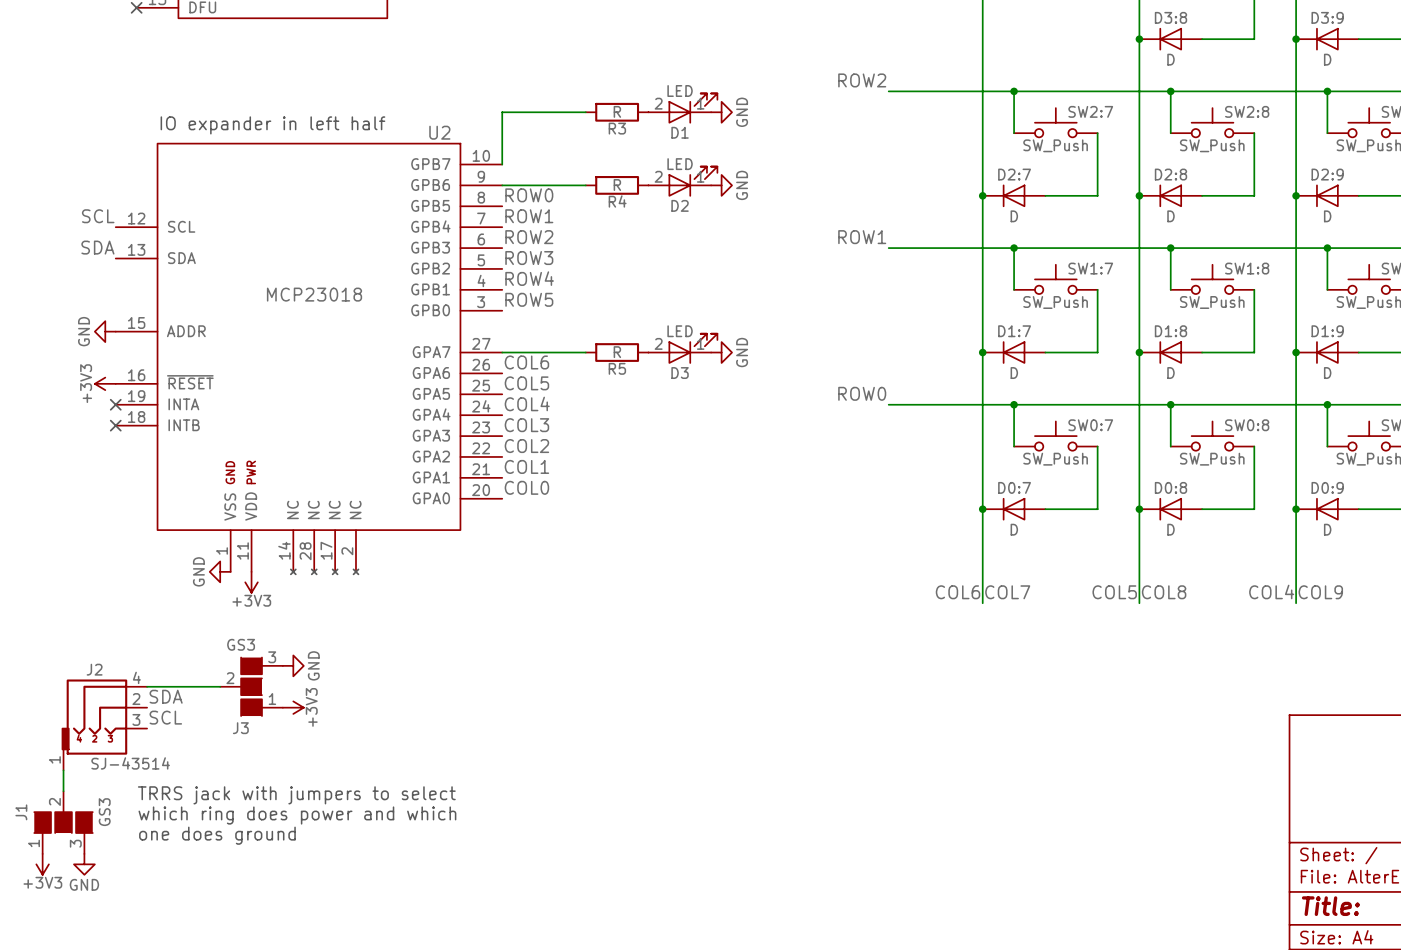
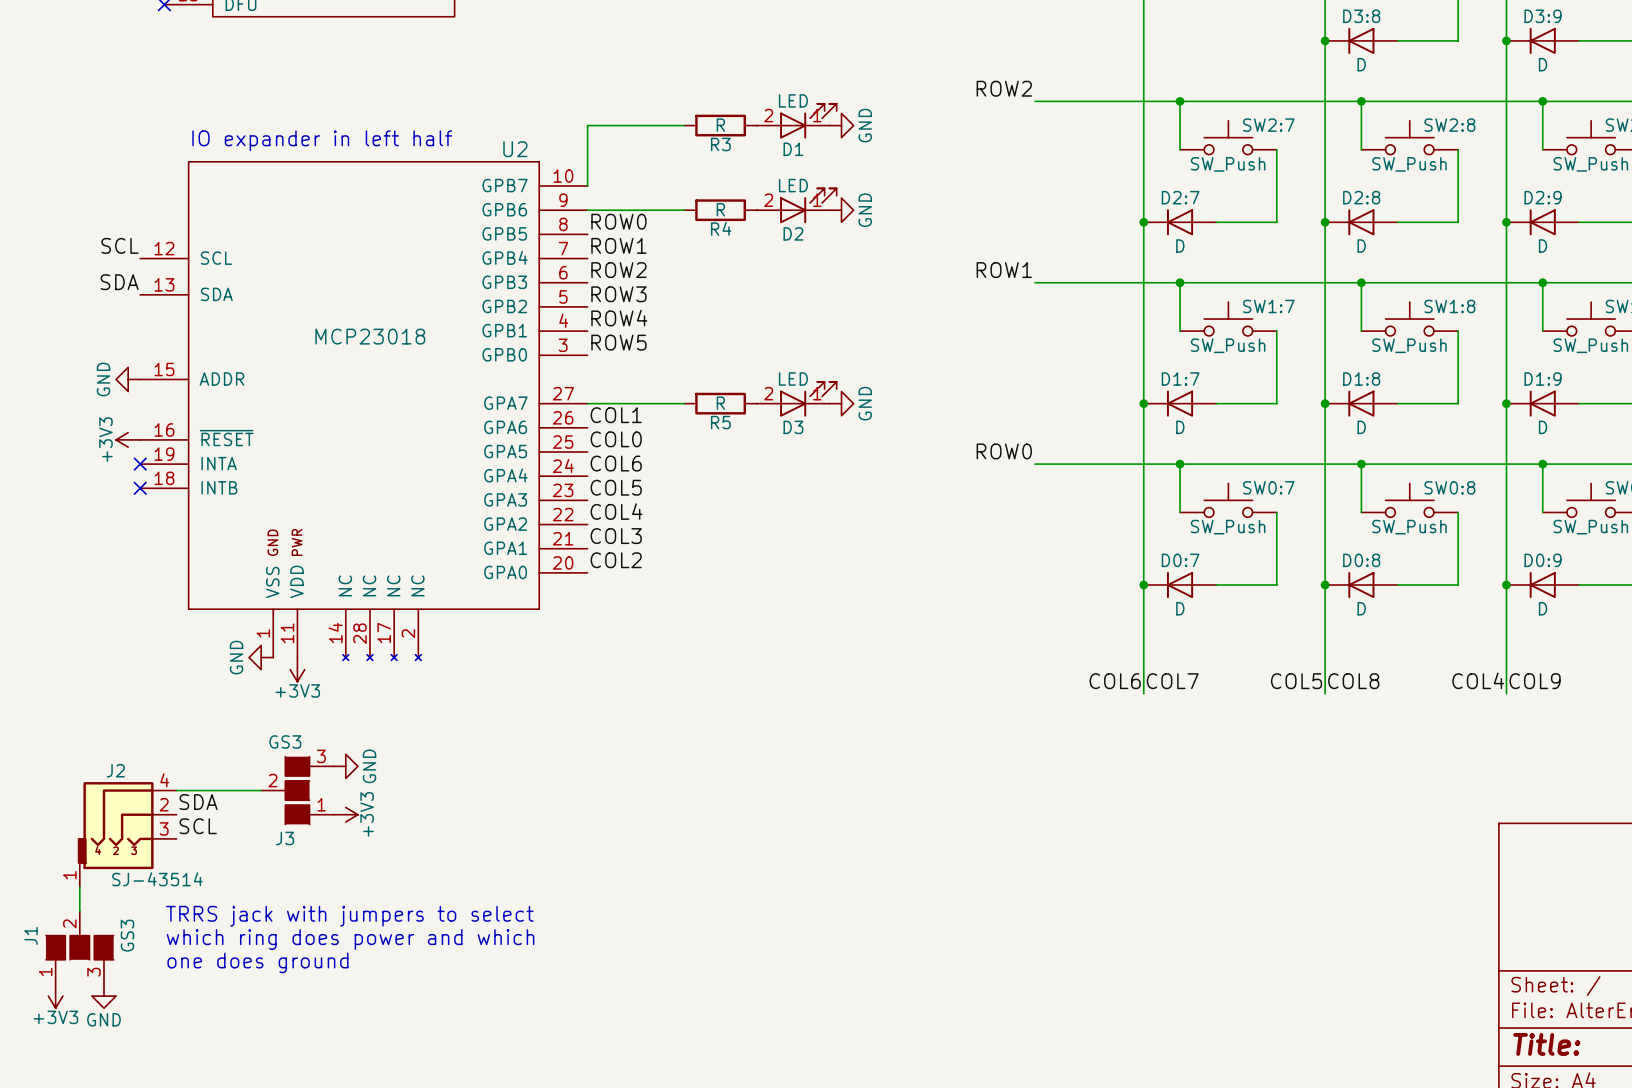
label: COL6 (526, 362) -> COL1 (616, 415)
label: COL5 (526, 383) -> COL0 (616, 439)
label: COL4 (527, 403) -> COL6 (616, 463)
label: COL3 (526, 425) -> COL5 (616, 487)
label: COL2 (526, 446) -> COL4 (616, 511)
label: COL1 (526, 466) -> COL3 (616, 536)
label: COL0 (526, 487) -> COL2 (616, 560)

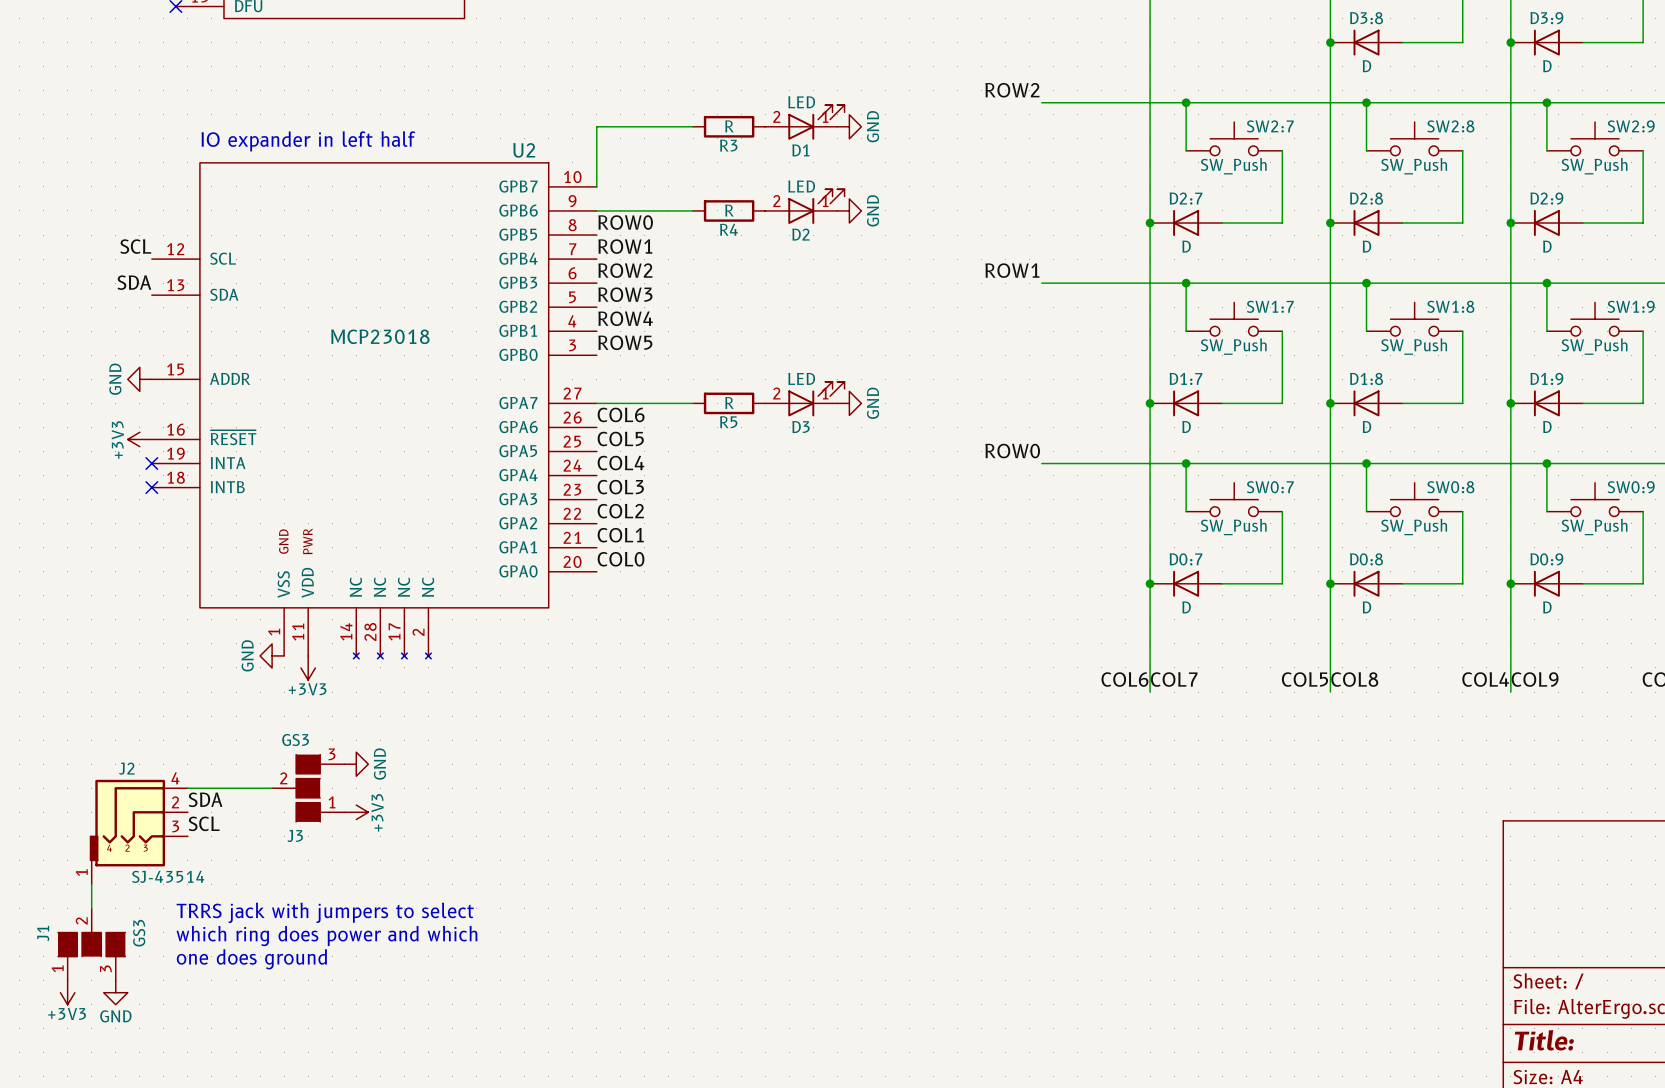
label: COL1 (616, 415) -> COL6 (621, 414)
label: COL0 (616, 439) -> COL5 (620, 438)
label: COL6 (616, 463) -> COL4 (620, 463)
label: COL5 (616, 487) -> COL3 (620, 487)
label: COL4 (616, 511) -> COL2 (620, 511)
label: COL3 (616, 536) -> COL1 (620, 535)
label: COL2 (616, 560) -> COL0 (621, 559)

